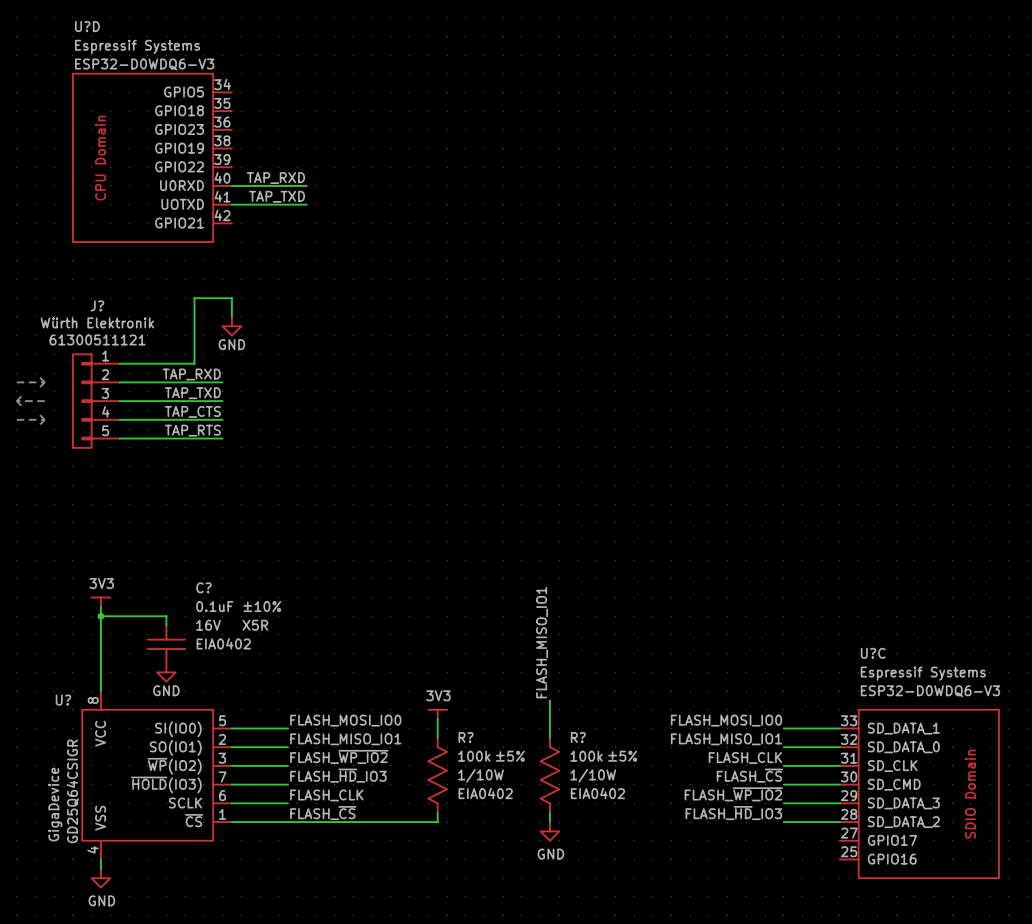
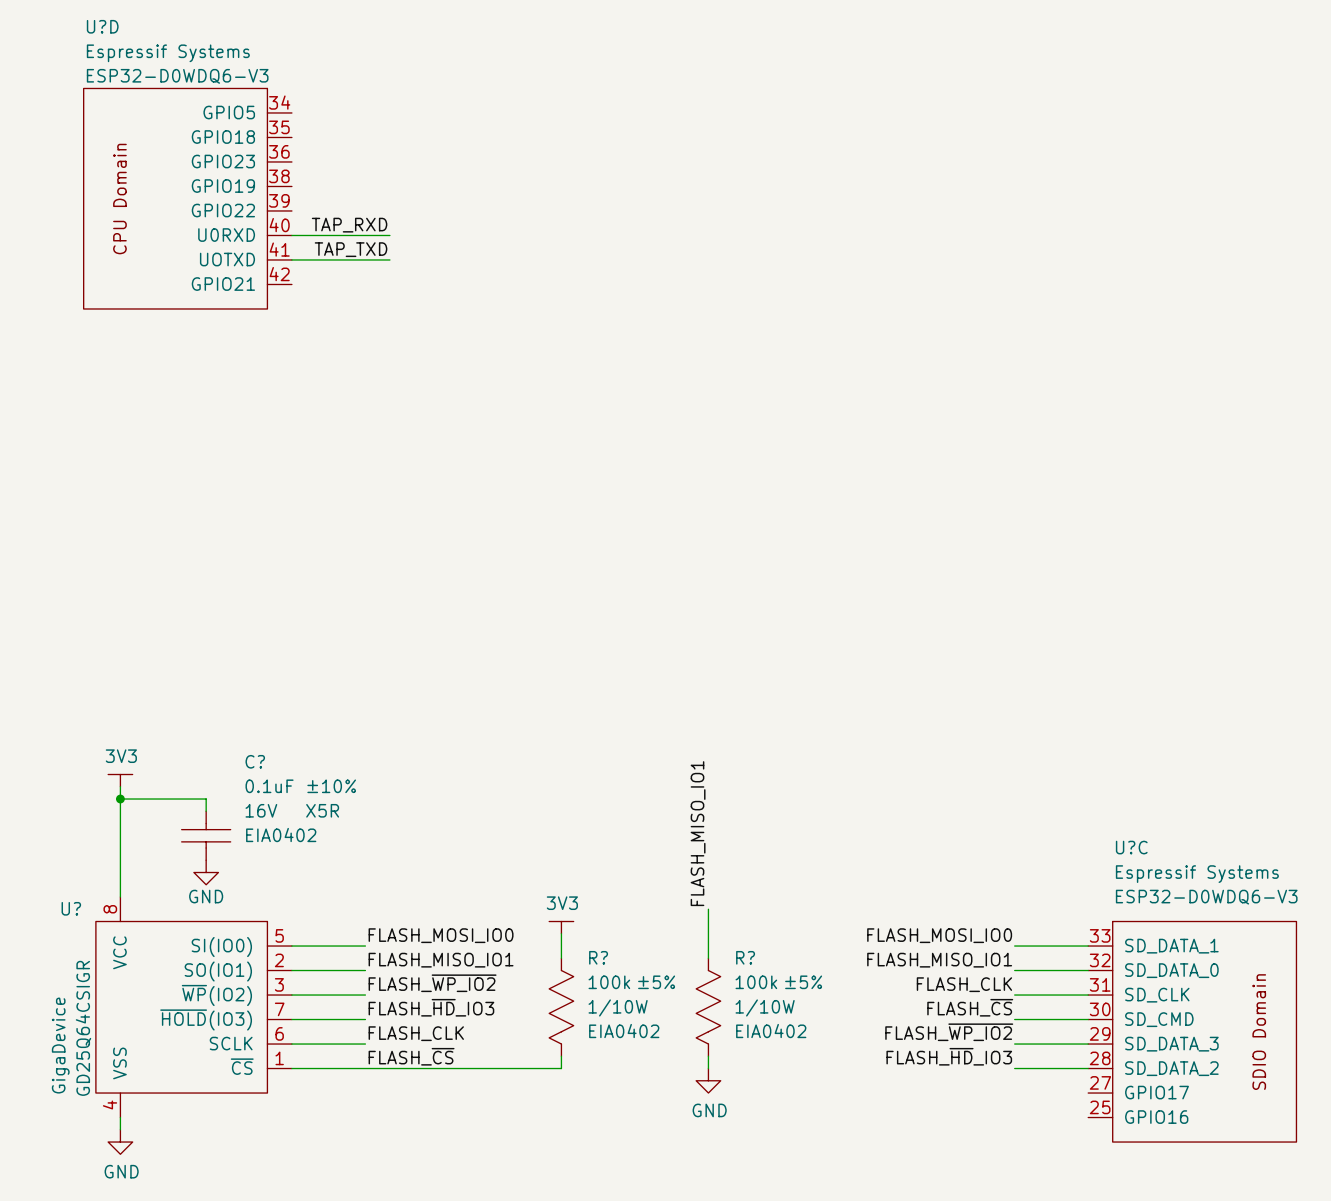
wire: (231, 316) (231, 298) (194, 298) (194, 363) (119, 363) -> none
power symbol: GND (231, 326) -> none
label: TAP_RXD (191, 374) -> none
line: (40, 377) (44, 382) -> none
line: (16, 382) (44, 382) -> none
line: (44, 382) (40, 387) -> none
wire: (119, 382) (222, 382) -> none
label: TAP_TXD (192, 393) -> none
line: (21, 396) (16, 401) -> none
line: (16, 401) (44, 401) -> none
line: (16, 401) (21, 405) -> none
J?: (95, 401) -> none
wire: (119, 401) (222, 401) -> none
label: TAP_CTS (192, 411) -> none
line: (40, 415) (44, 419) -> none
line: (16, 419) (44, 419) -> none
line: (44, 419) (40, 424) -> none
wire: (119, 419) (222, 419) -> none
label: TAP_RTS (192, 430) -> none
wire: (119, 438) (222, 438) -> none

